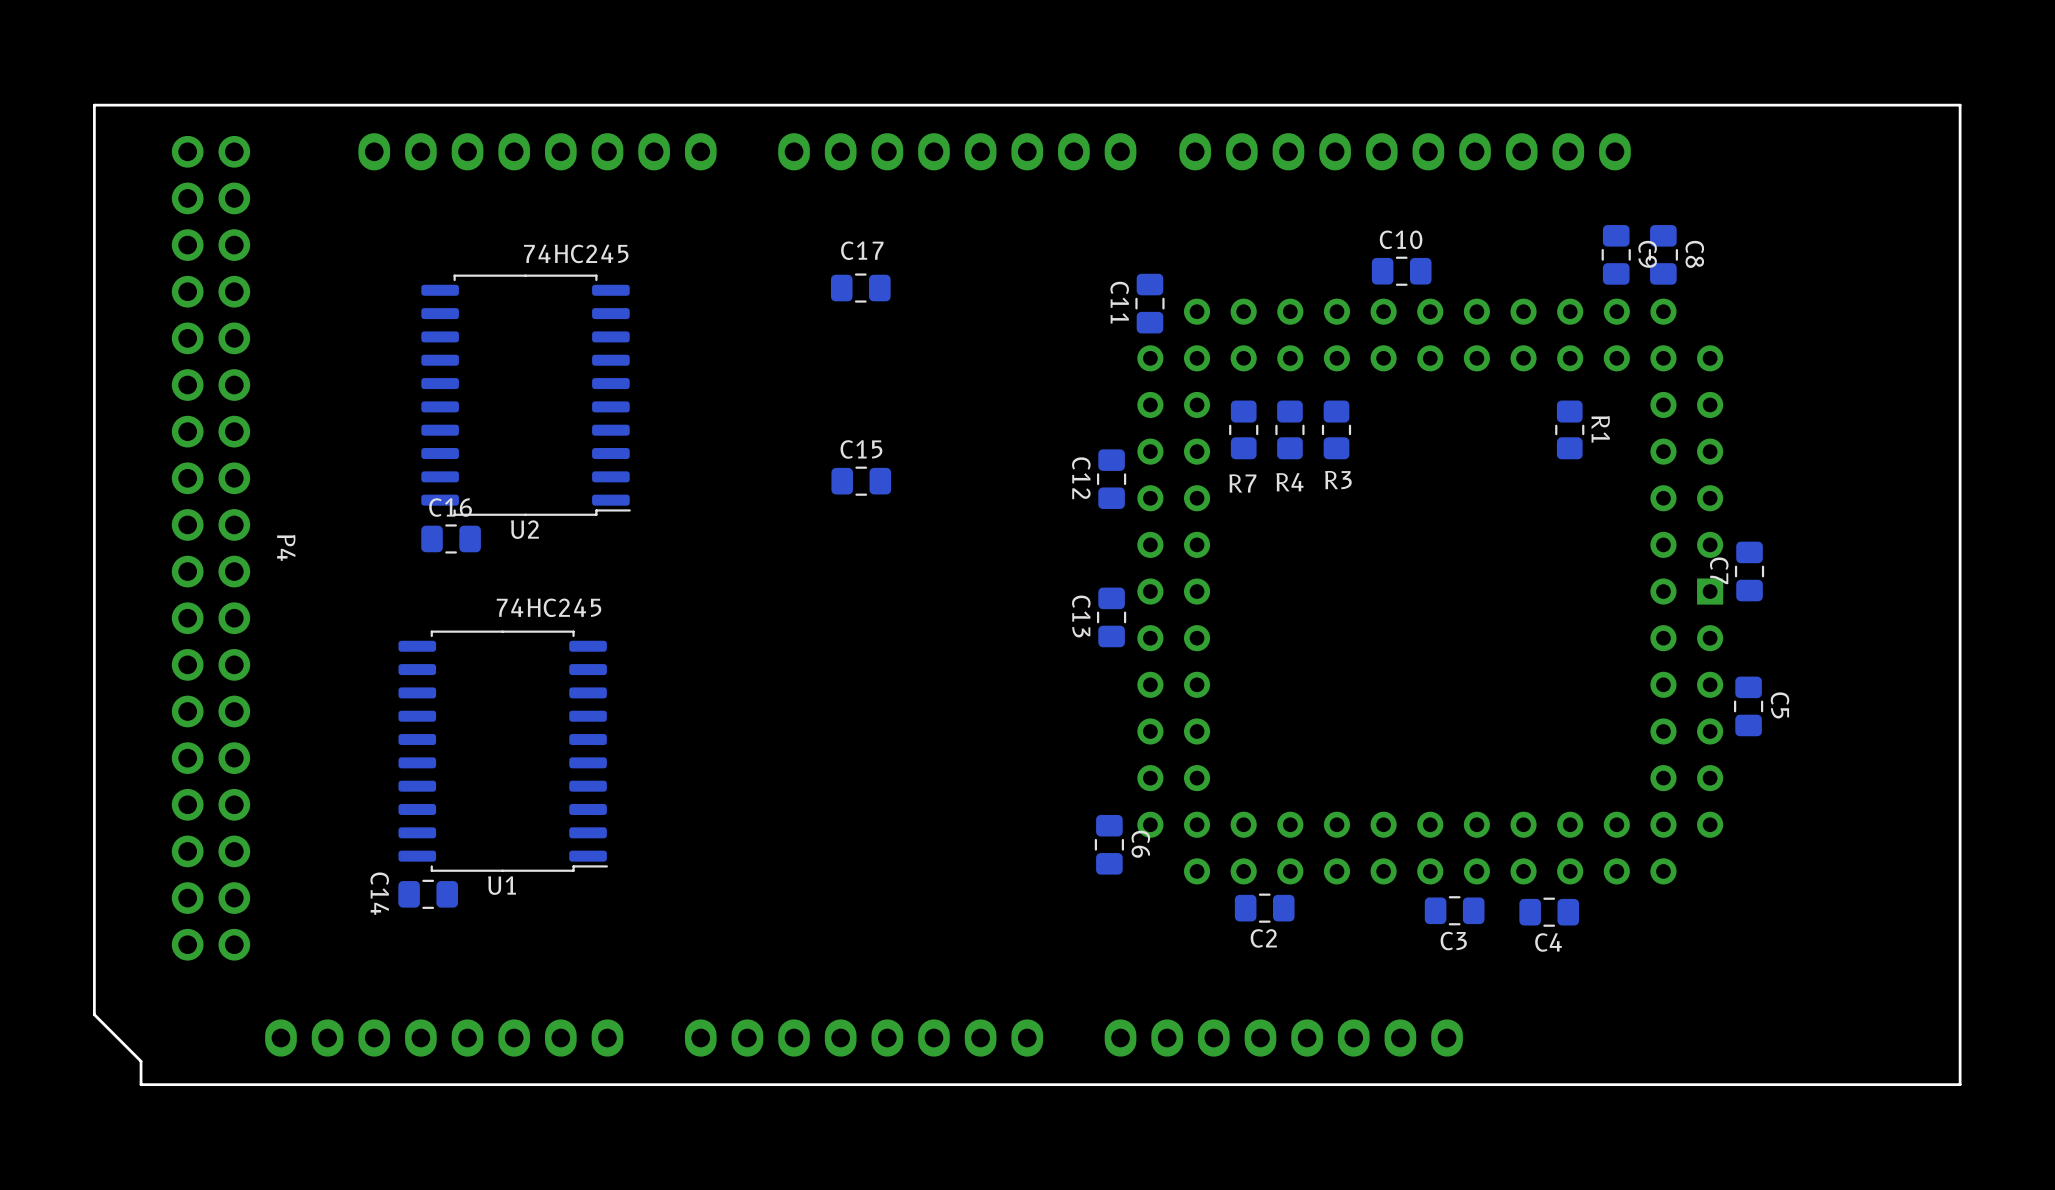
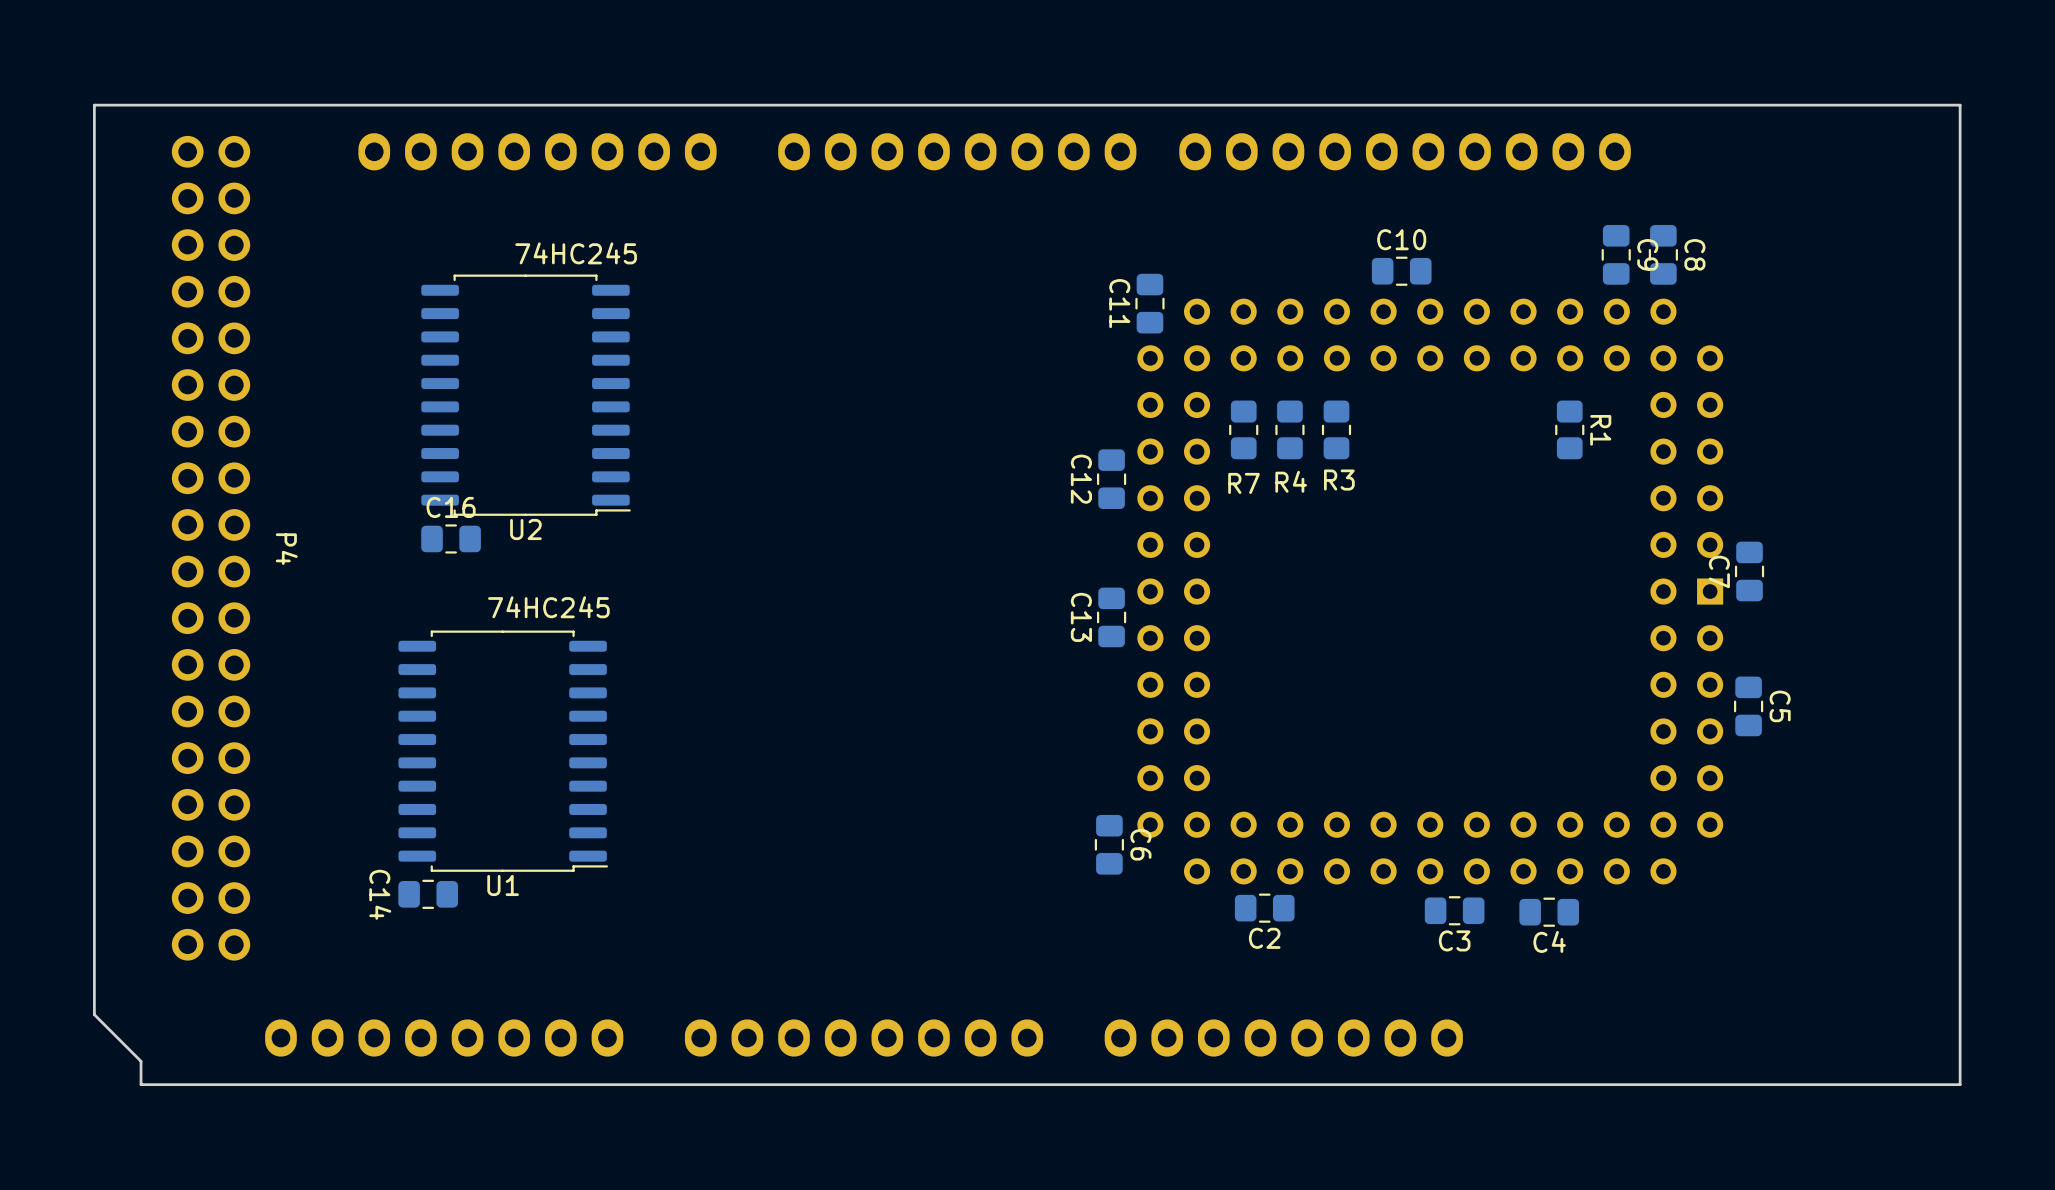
C17: (860, 288) -> none
C15: (861, 481) -> none

